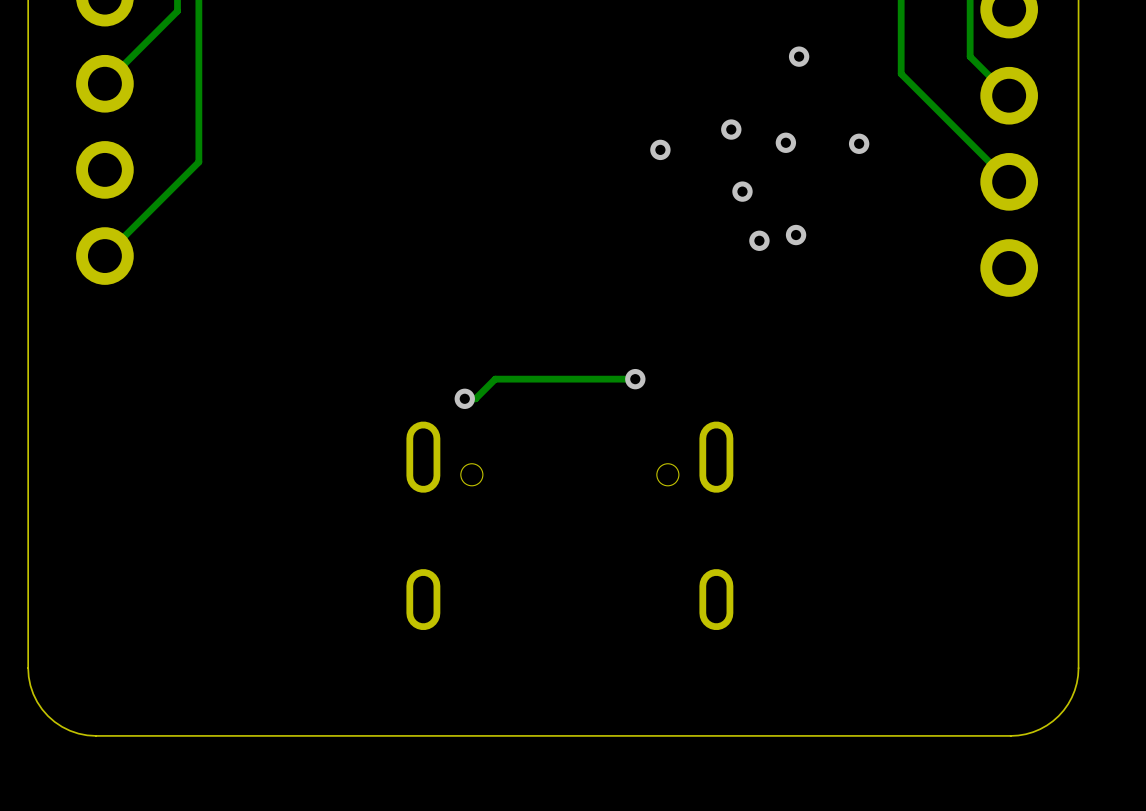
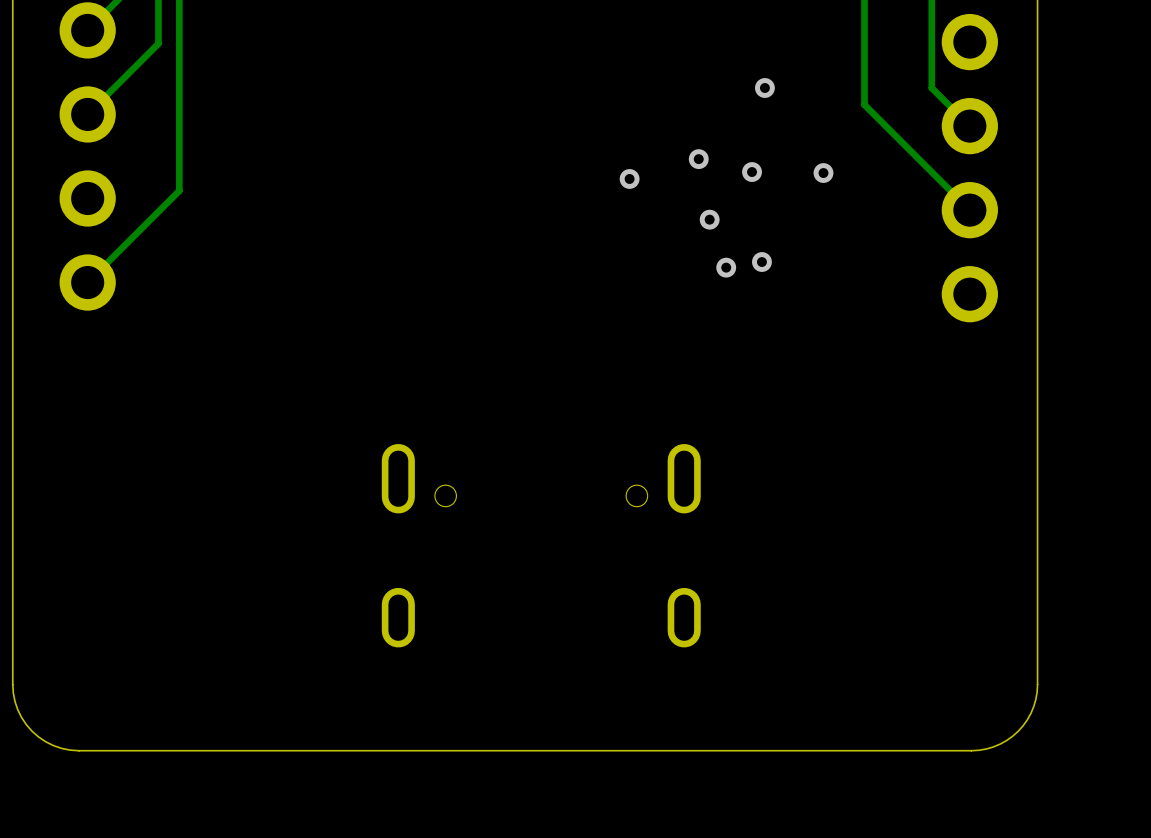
track: (635, 379) (495, 379) (475, 398) (464, 398) -> none
via: (635, 379) -> none
via: (464, 398) -> none

